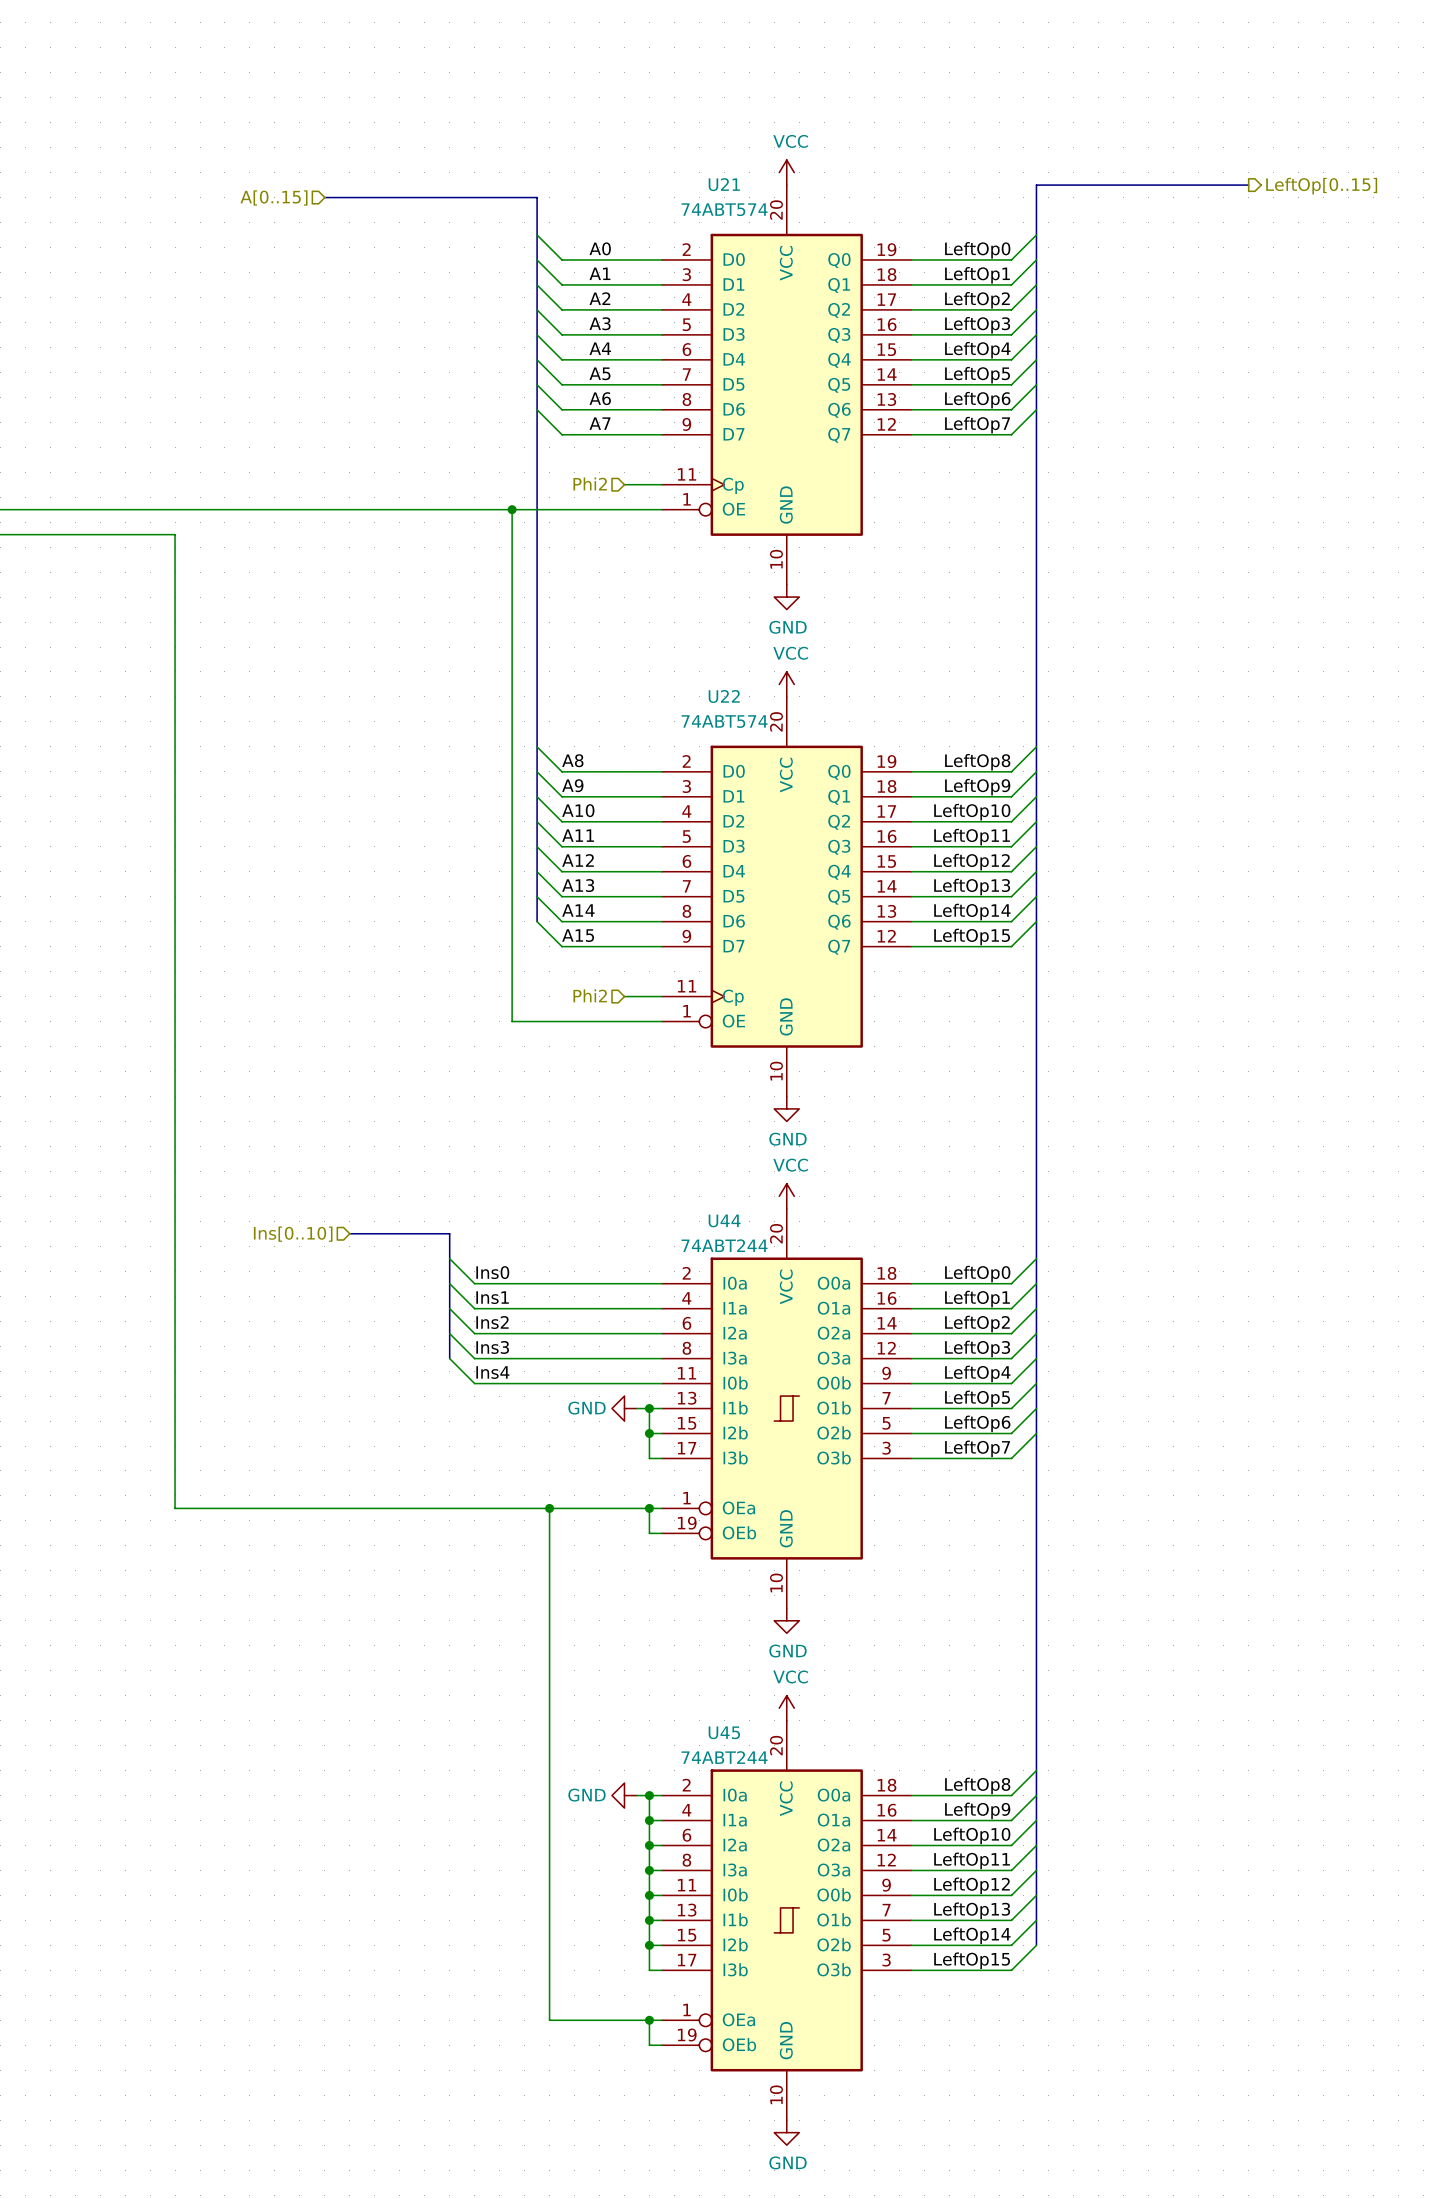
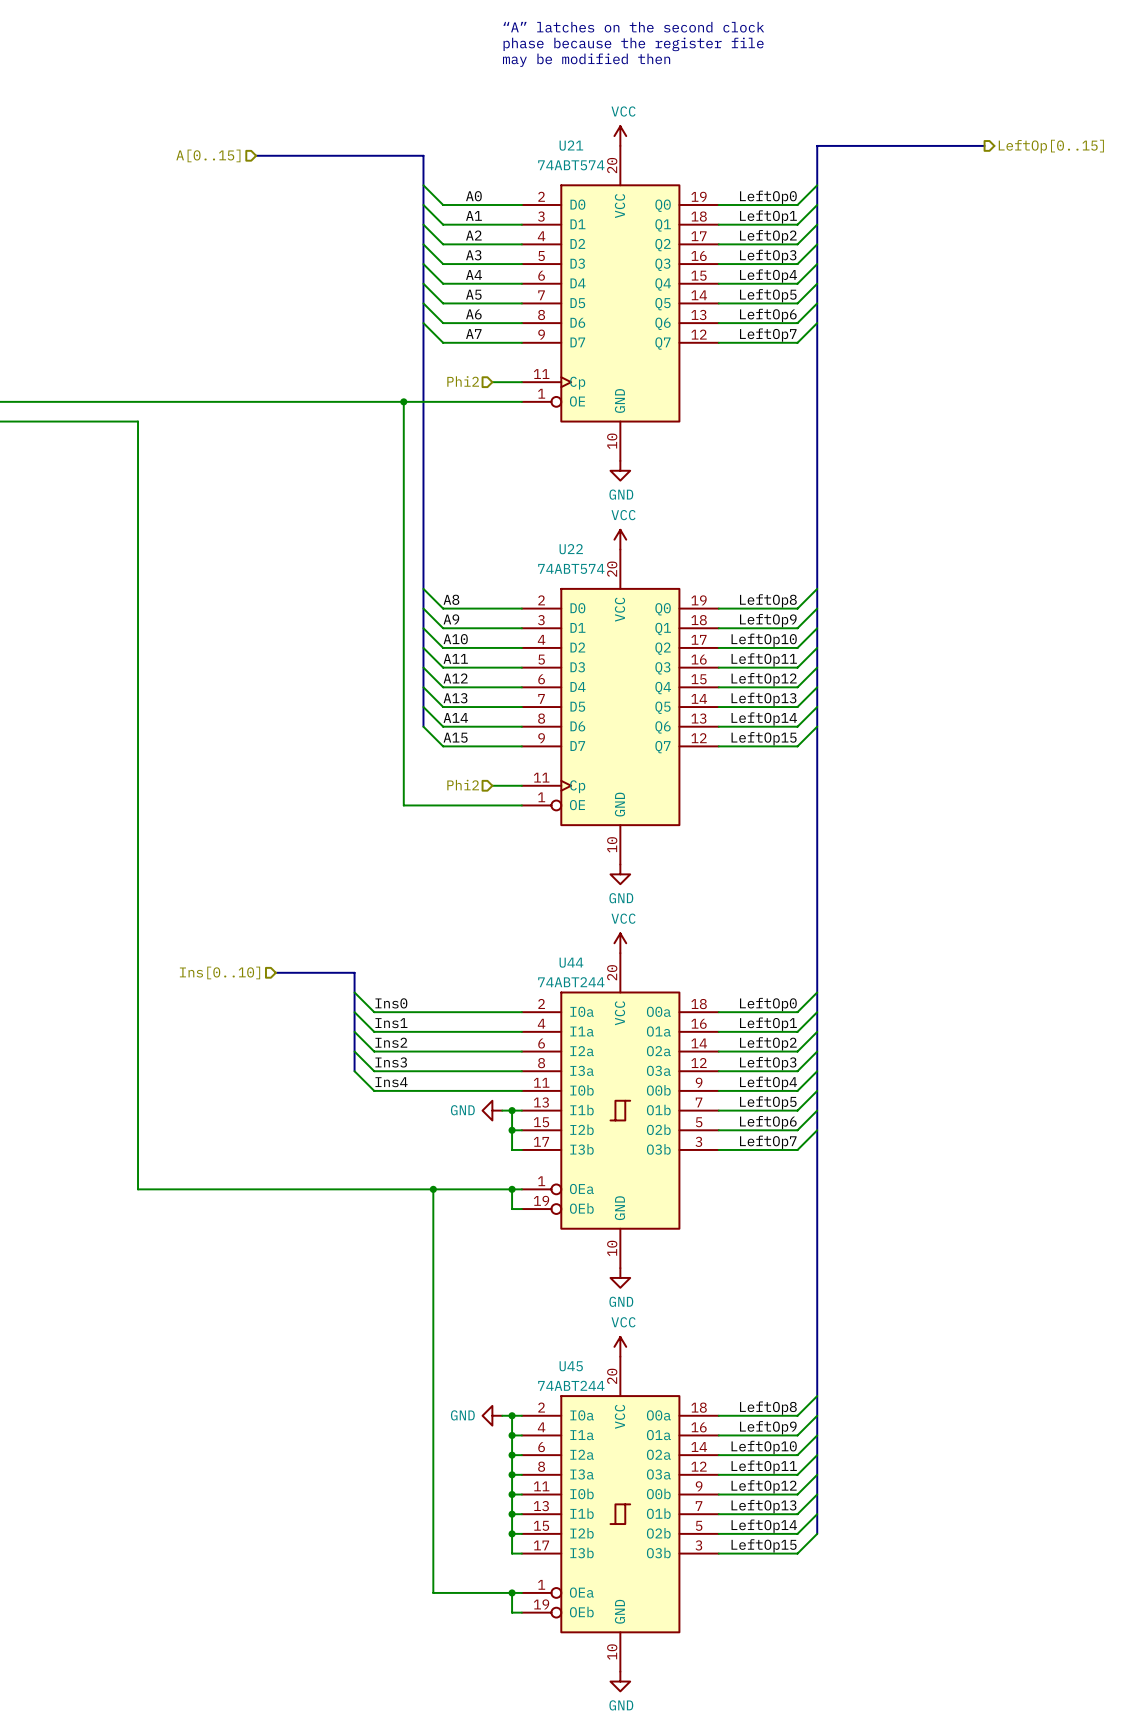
text: none -> “A” latches on the second clock (633, 27)
text: none -> phase because the register file (633, 44)
text: none -> may be modified then (586, 60)

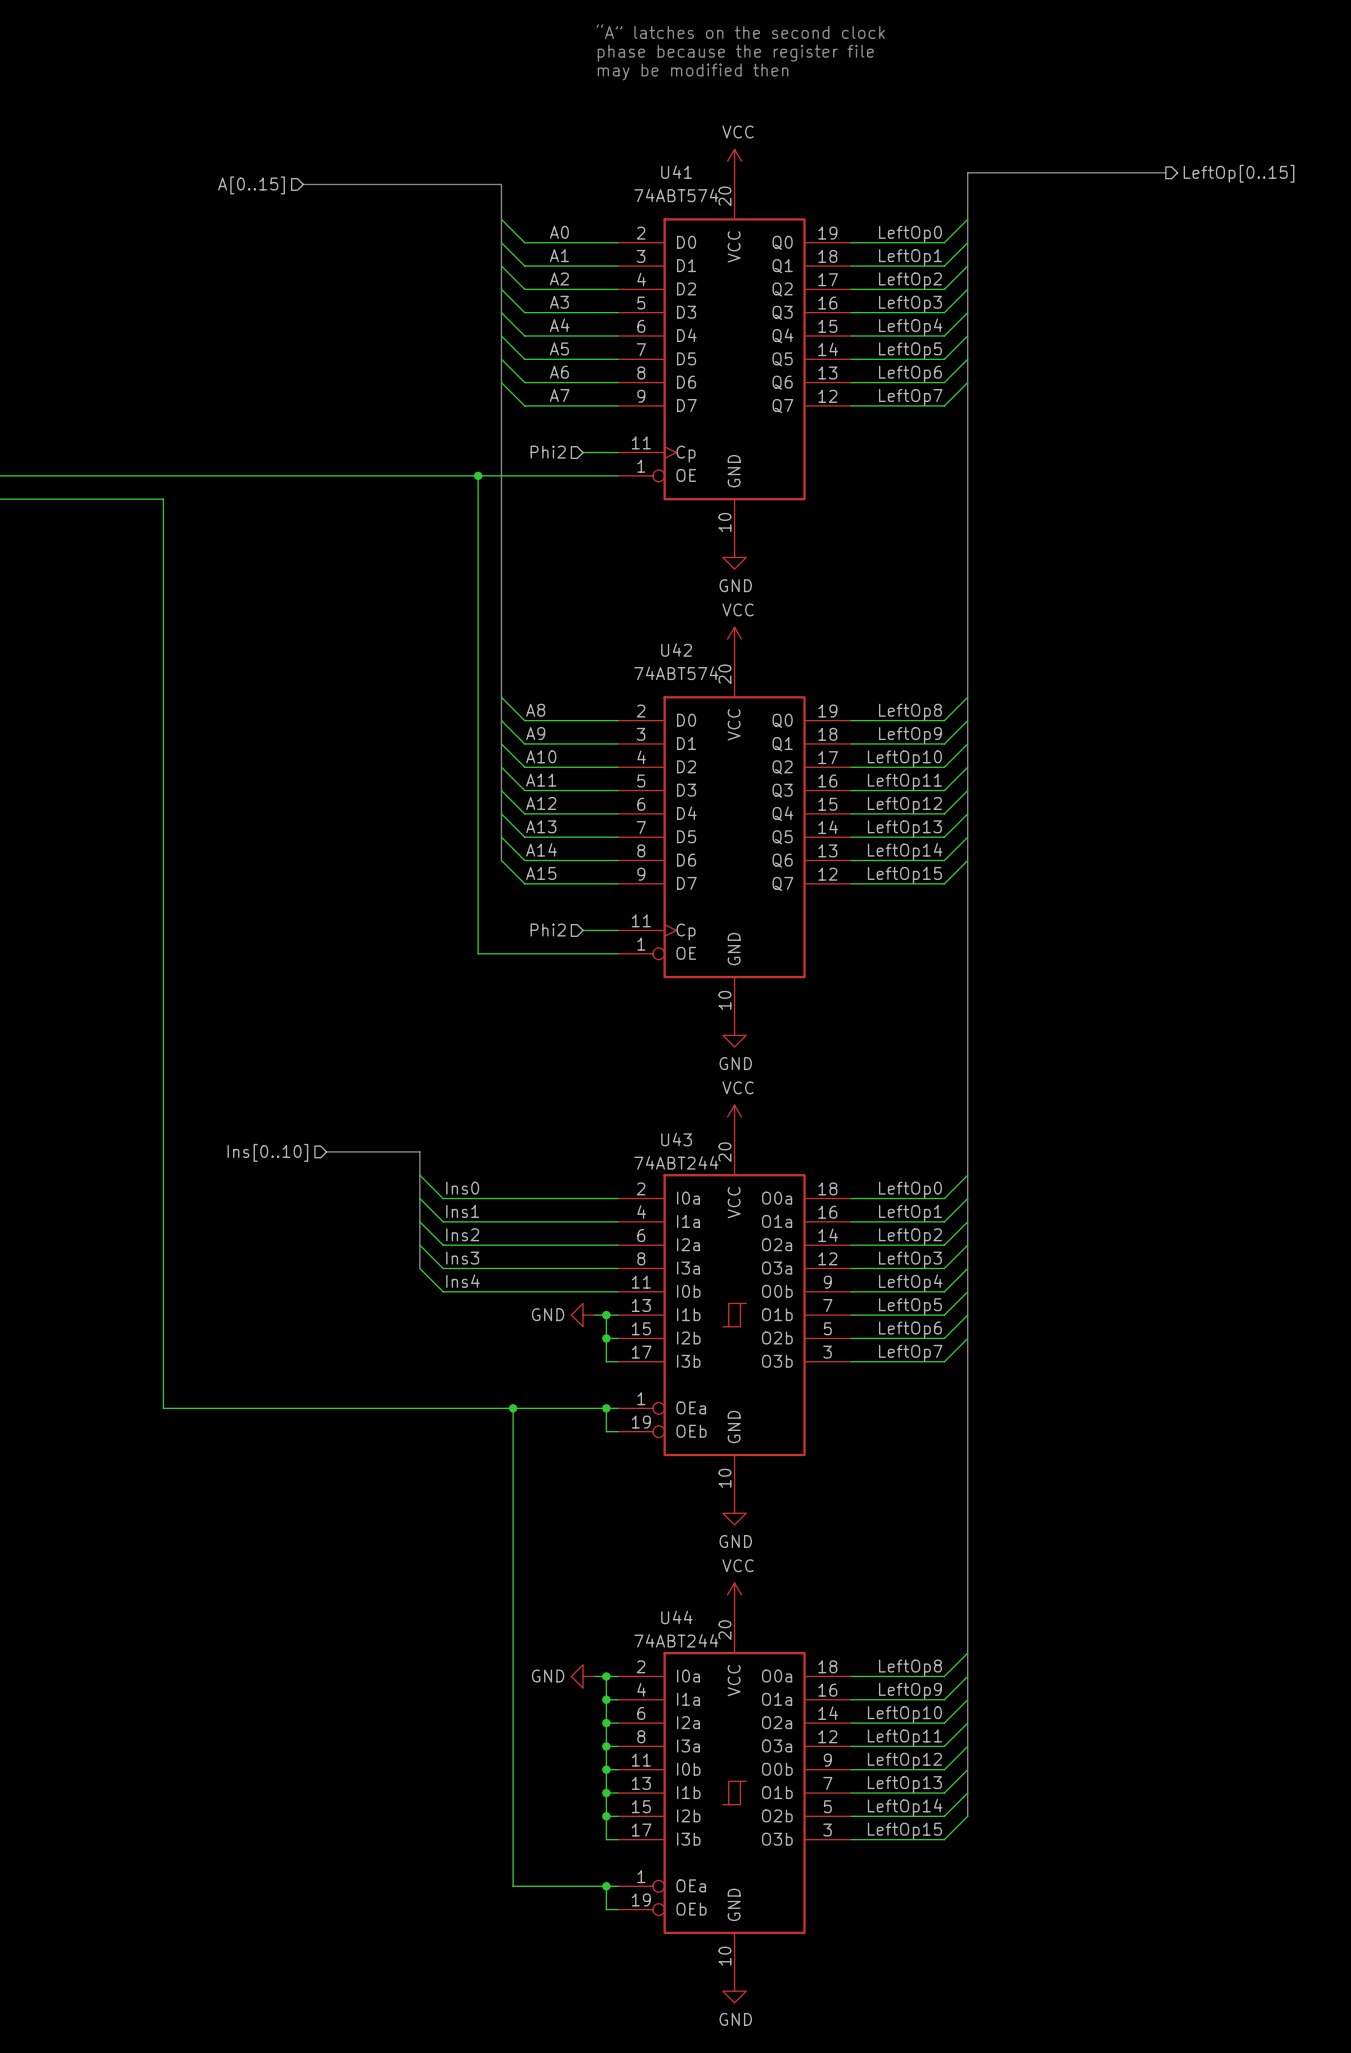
U21 name: U21 (571, 145) -> U41 (676, 172)
U22 name: U22 (571, 549) -> U42 (676, 649)
U44 name: U44 (571, 962) -> U43 (676, 1139)
U45 name: U45 (571, 1366) -> U44 (676, 1617)

